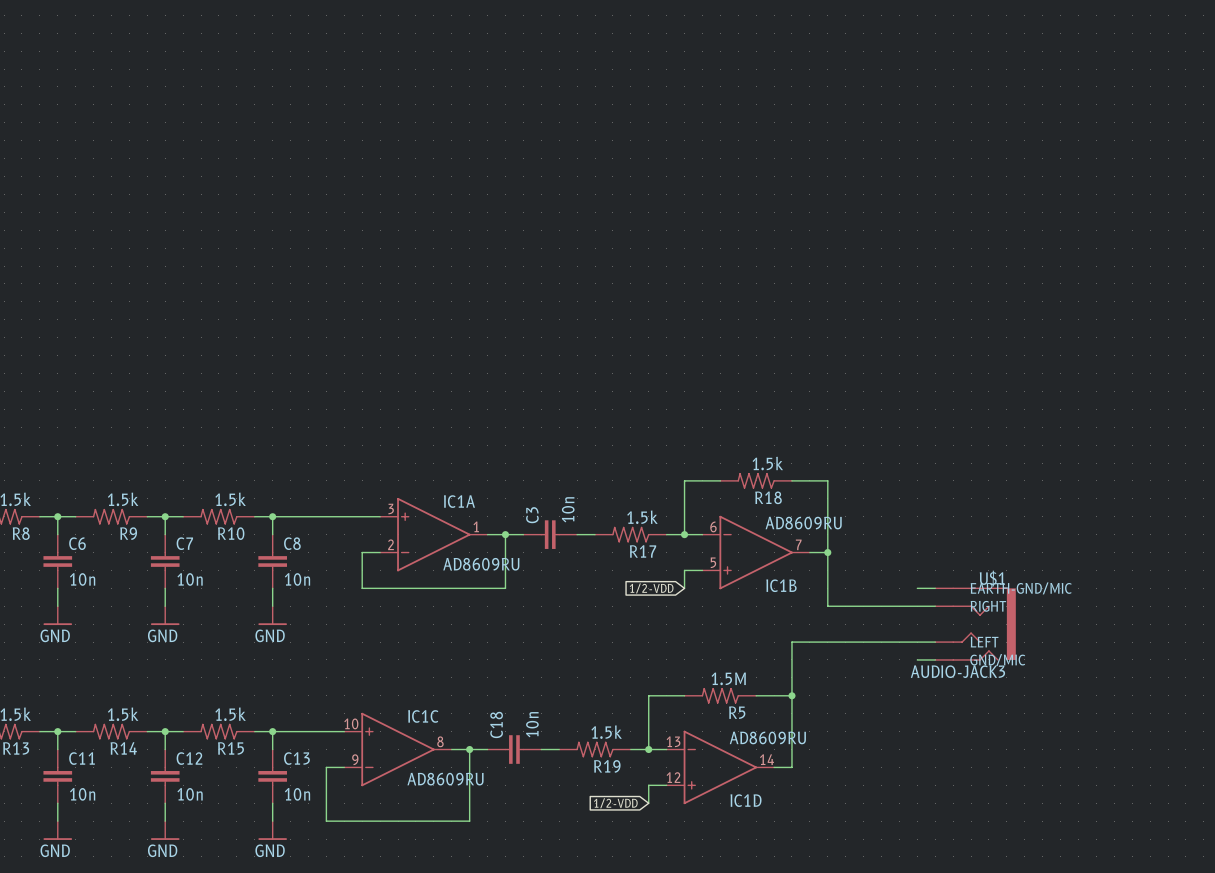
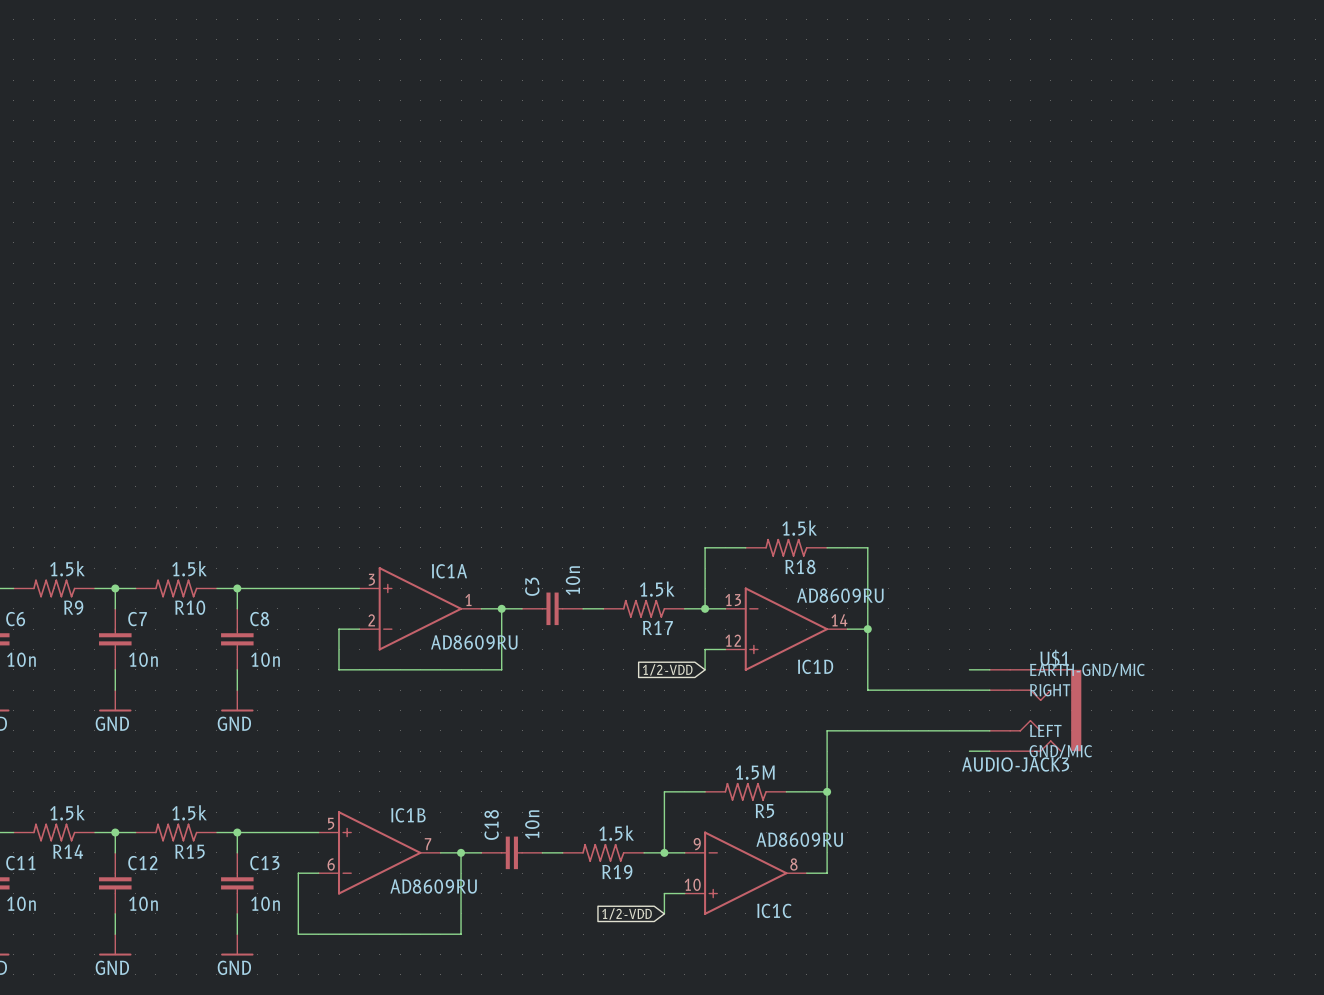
IC1B flip: as is (756, 552) -> up-down (379, 852)
IC1B position: (756, 552) -> (379, 852)
IC1C flip: as is (398, 749) -> up-down (745, 873)
IC1C position: (398, 749) -> (745, 873)
IC1D position: (720, 767) -> (786, 629)

